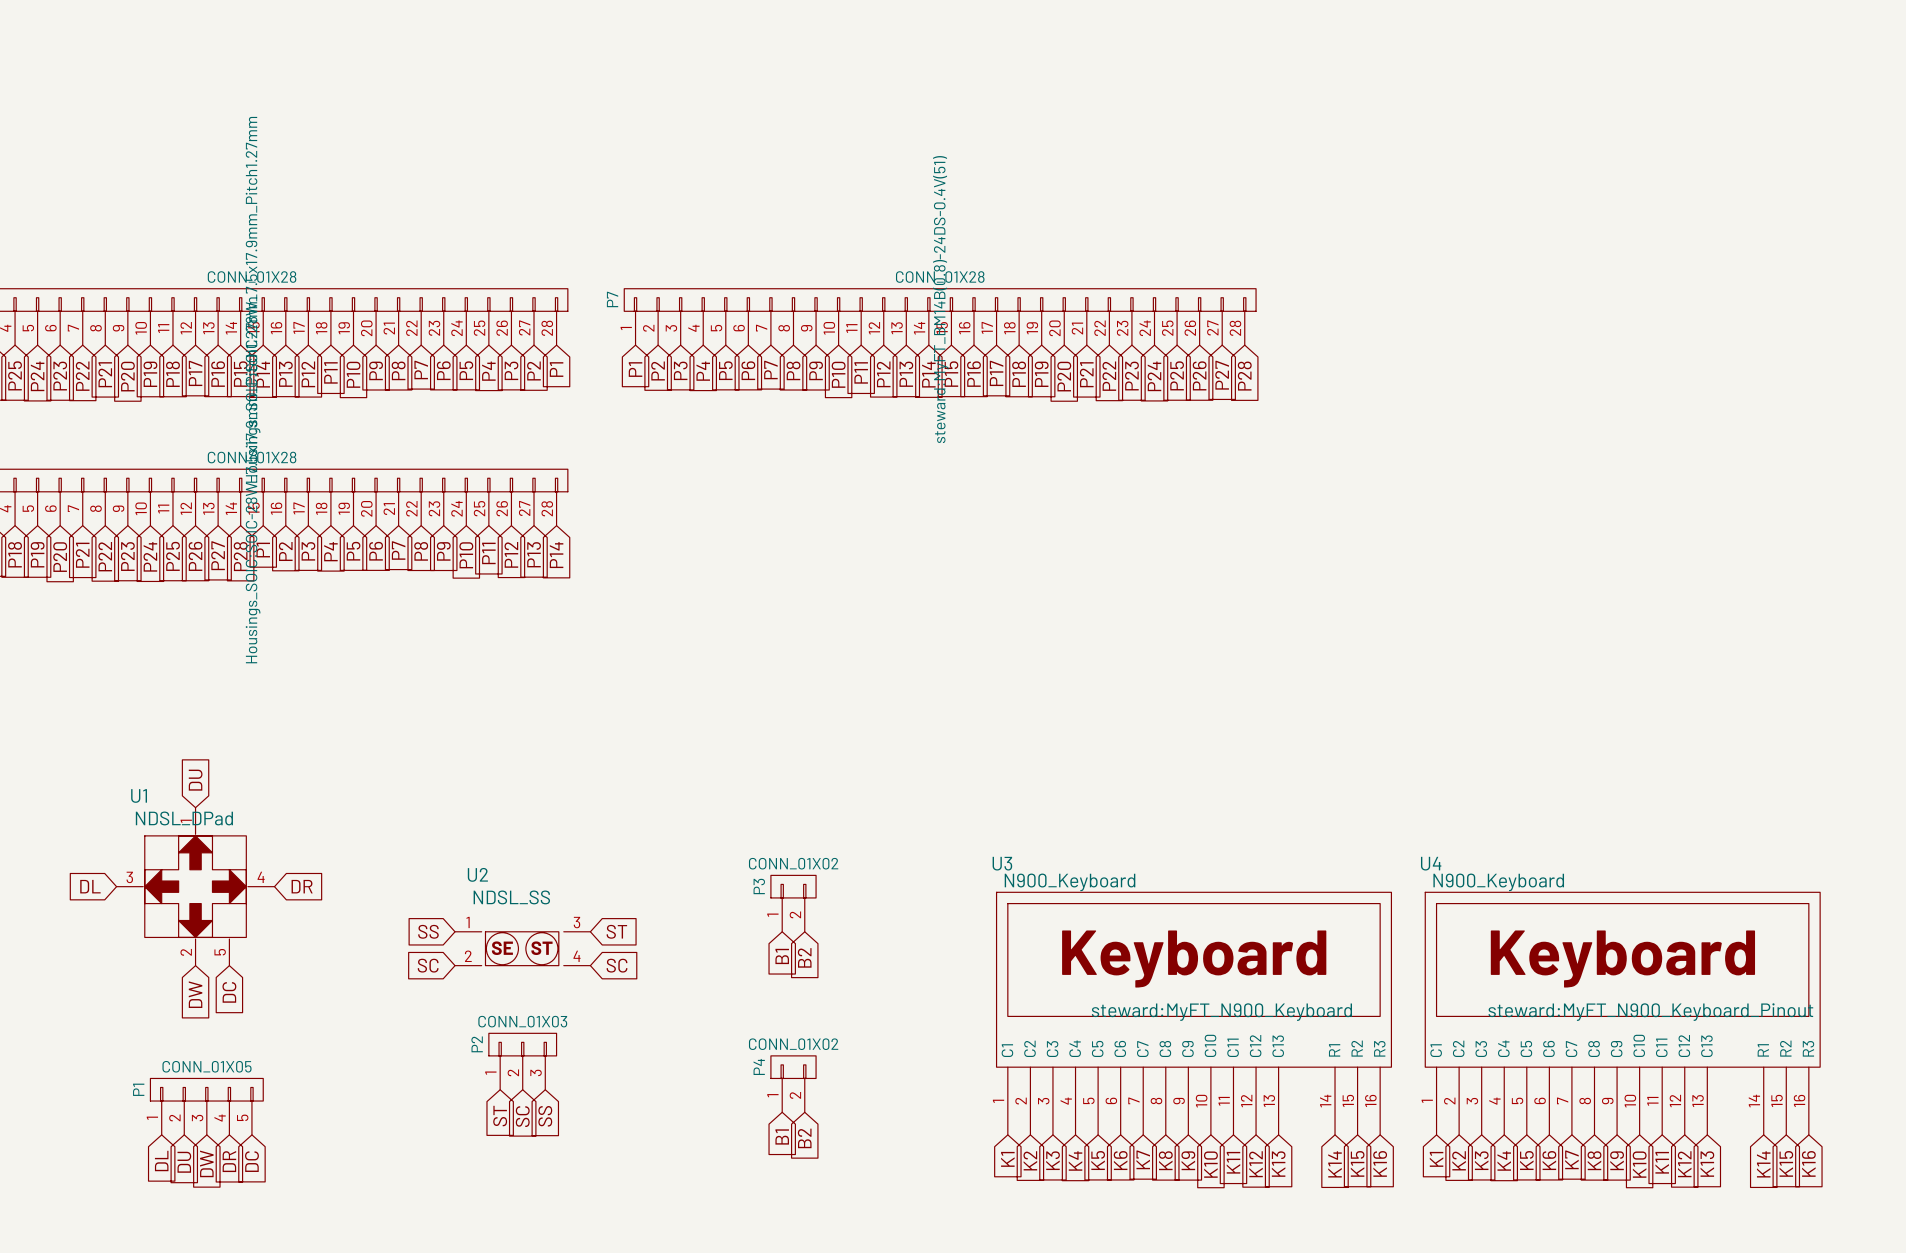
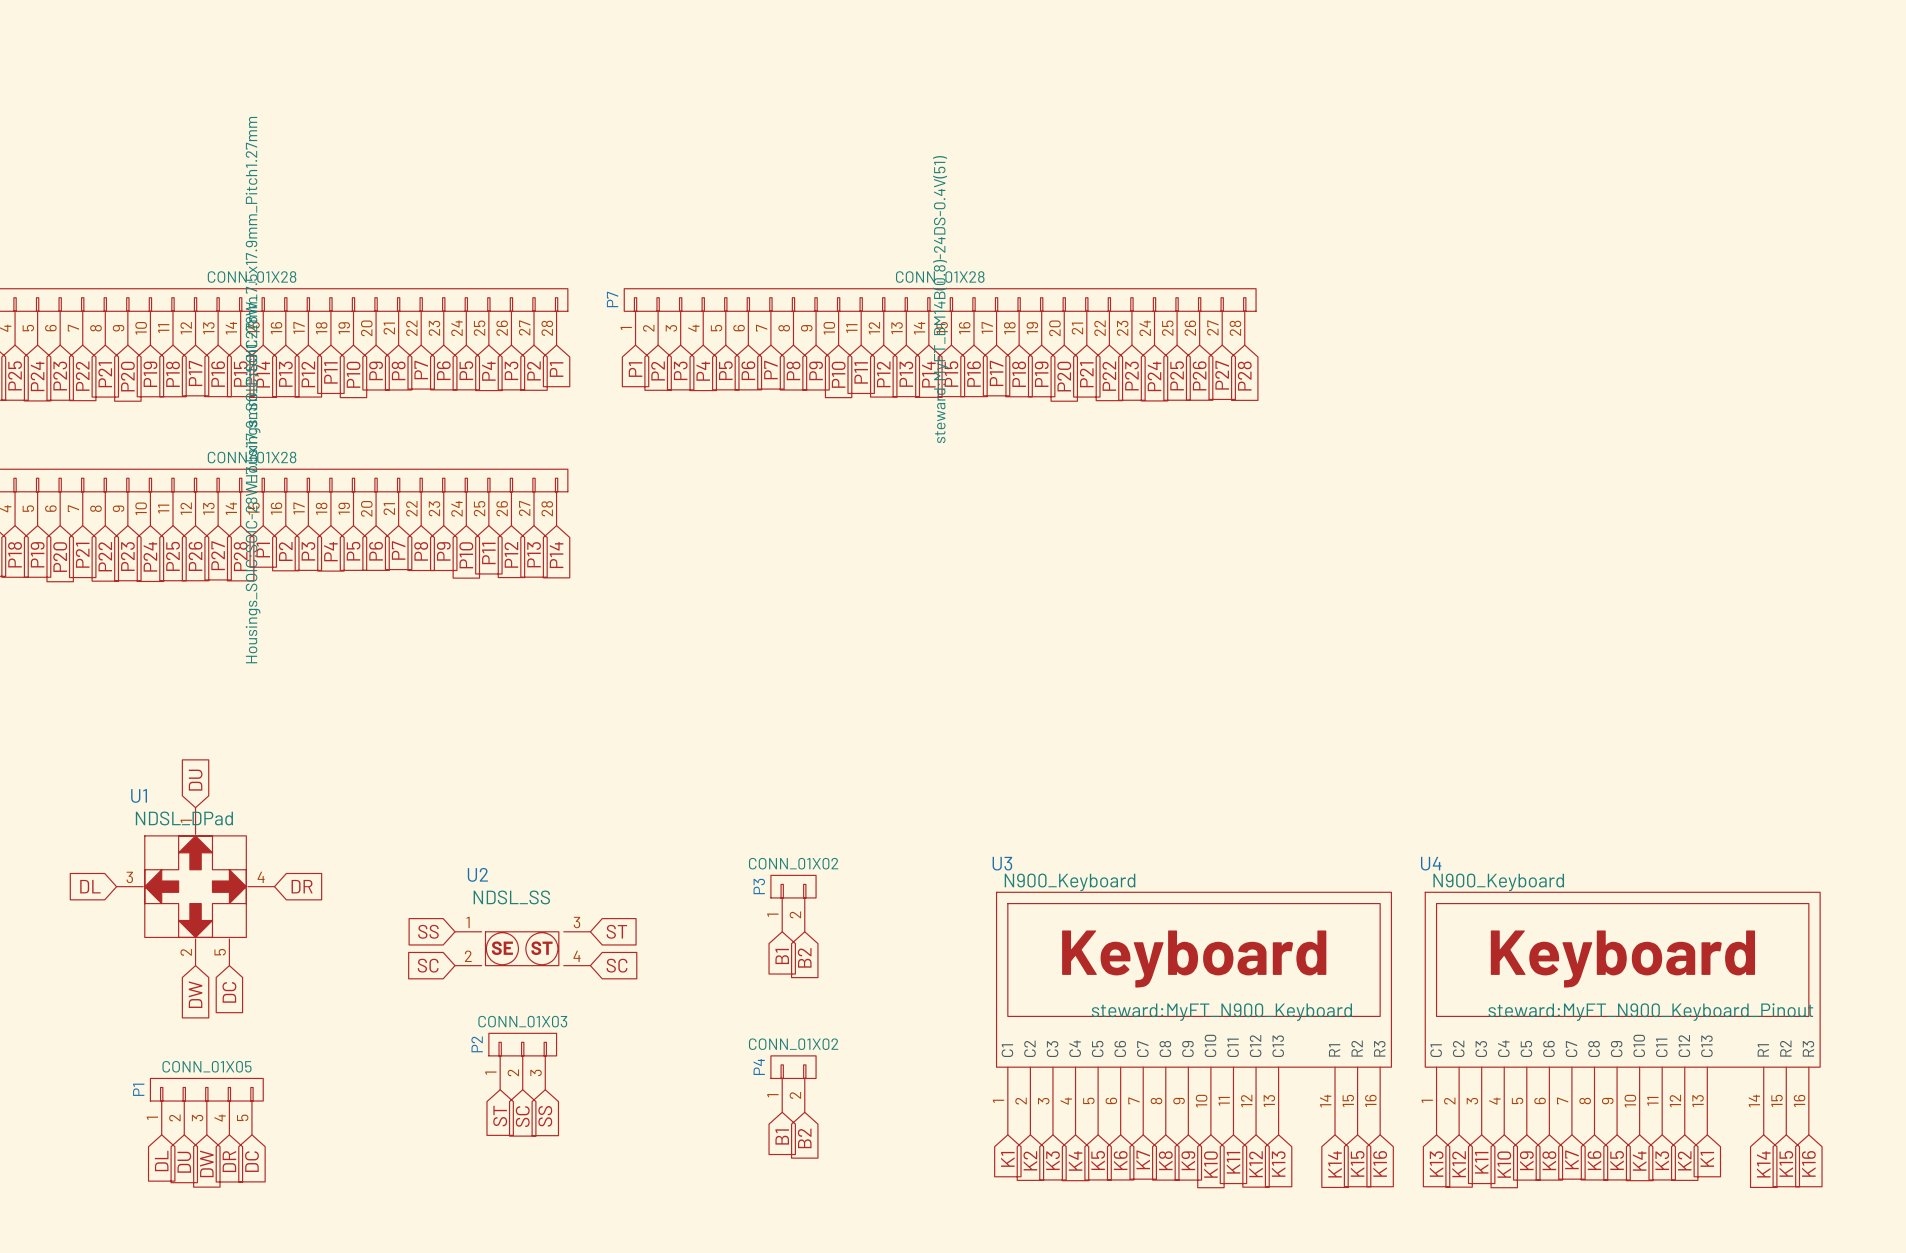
global label: K1 (1436, 1159) -> K13 (1436, 1164)
global label: K2 (1459, 1160) -> K12 (1459, 1164)
global label: K3 (1481, 1160) -> K11 (1481, 1162)
global label: K5 (1526, 1160) -> K9 (1526, 1160)
global label: K6 (1549, 1160) -> K8 (1549, 1160)
global label: K8 (1594, 1160) -> K6 (1594, 1160)
global label: K9 (1617, 1160) -> K5 (1617, 1160)
global label: K4 (1504, 1161) -> K10 (1504, 1164)
global label: K11 (1662, 1162) -> K3 (1662, 1160)
global label: K10 (1639, 1164) -> K4 (1639, 1161)
global label: K12 (1684, 1164) -> K2 (1684, 1160)
global label: K13 (1707, 1164) -> K1 (1707, 1159)

